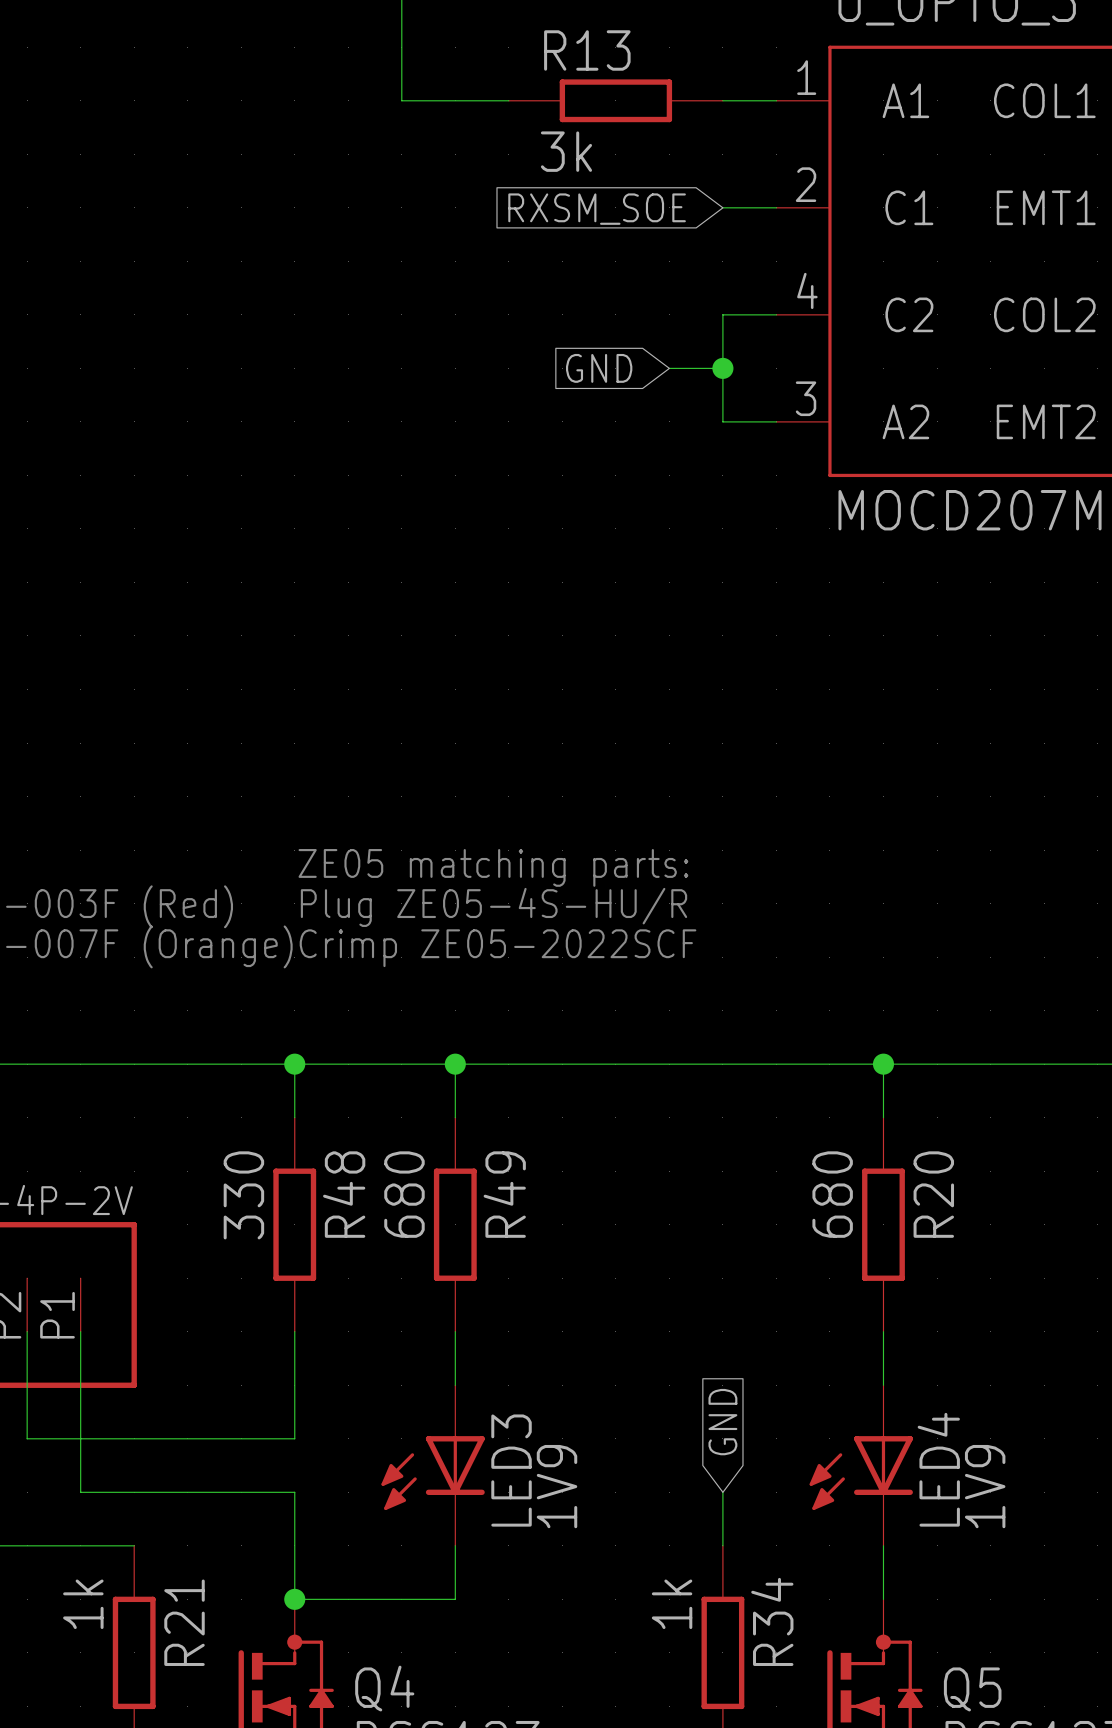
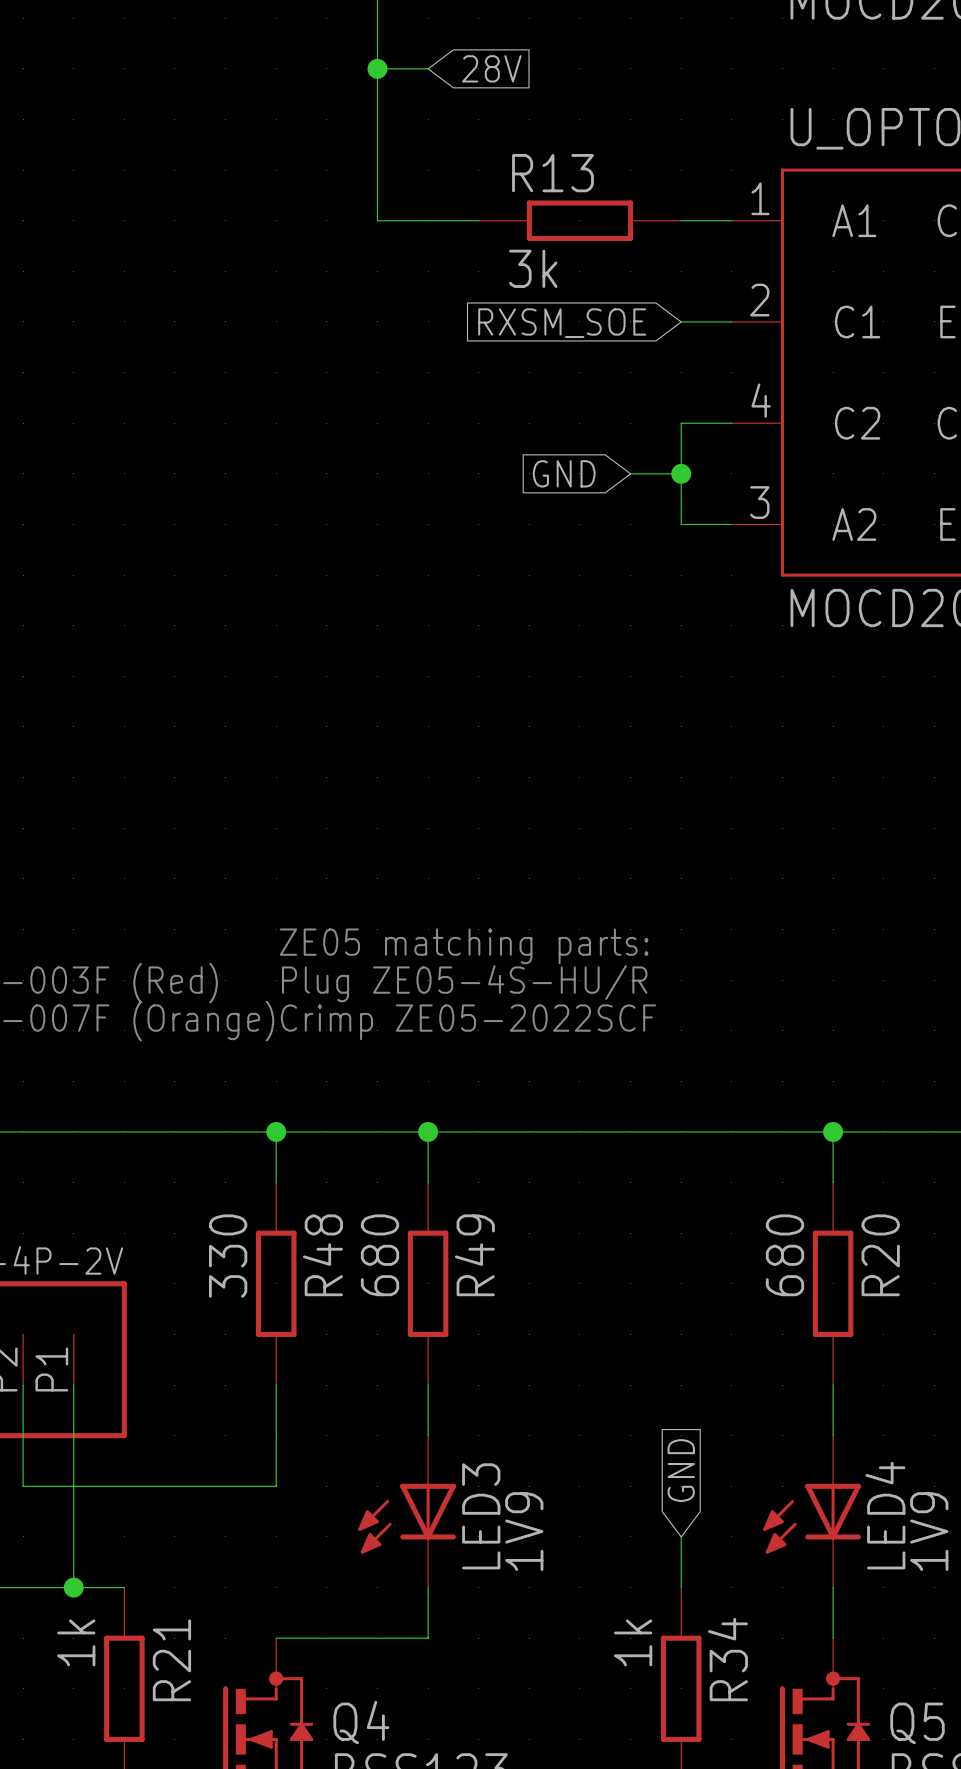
wire: (80, 1492) (294, 1492) (294, 1599) -> (73, 1536) (73, 1587)
junction: none -> (73, 1587)
junction: (294, 1599) -> none

